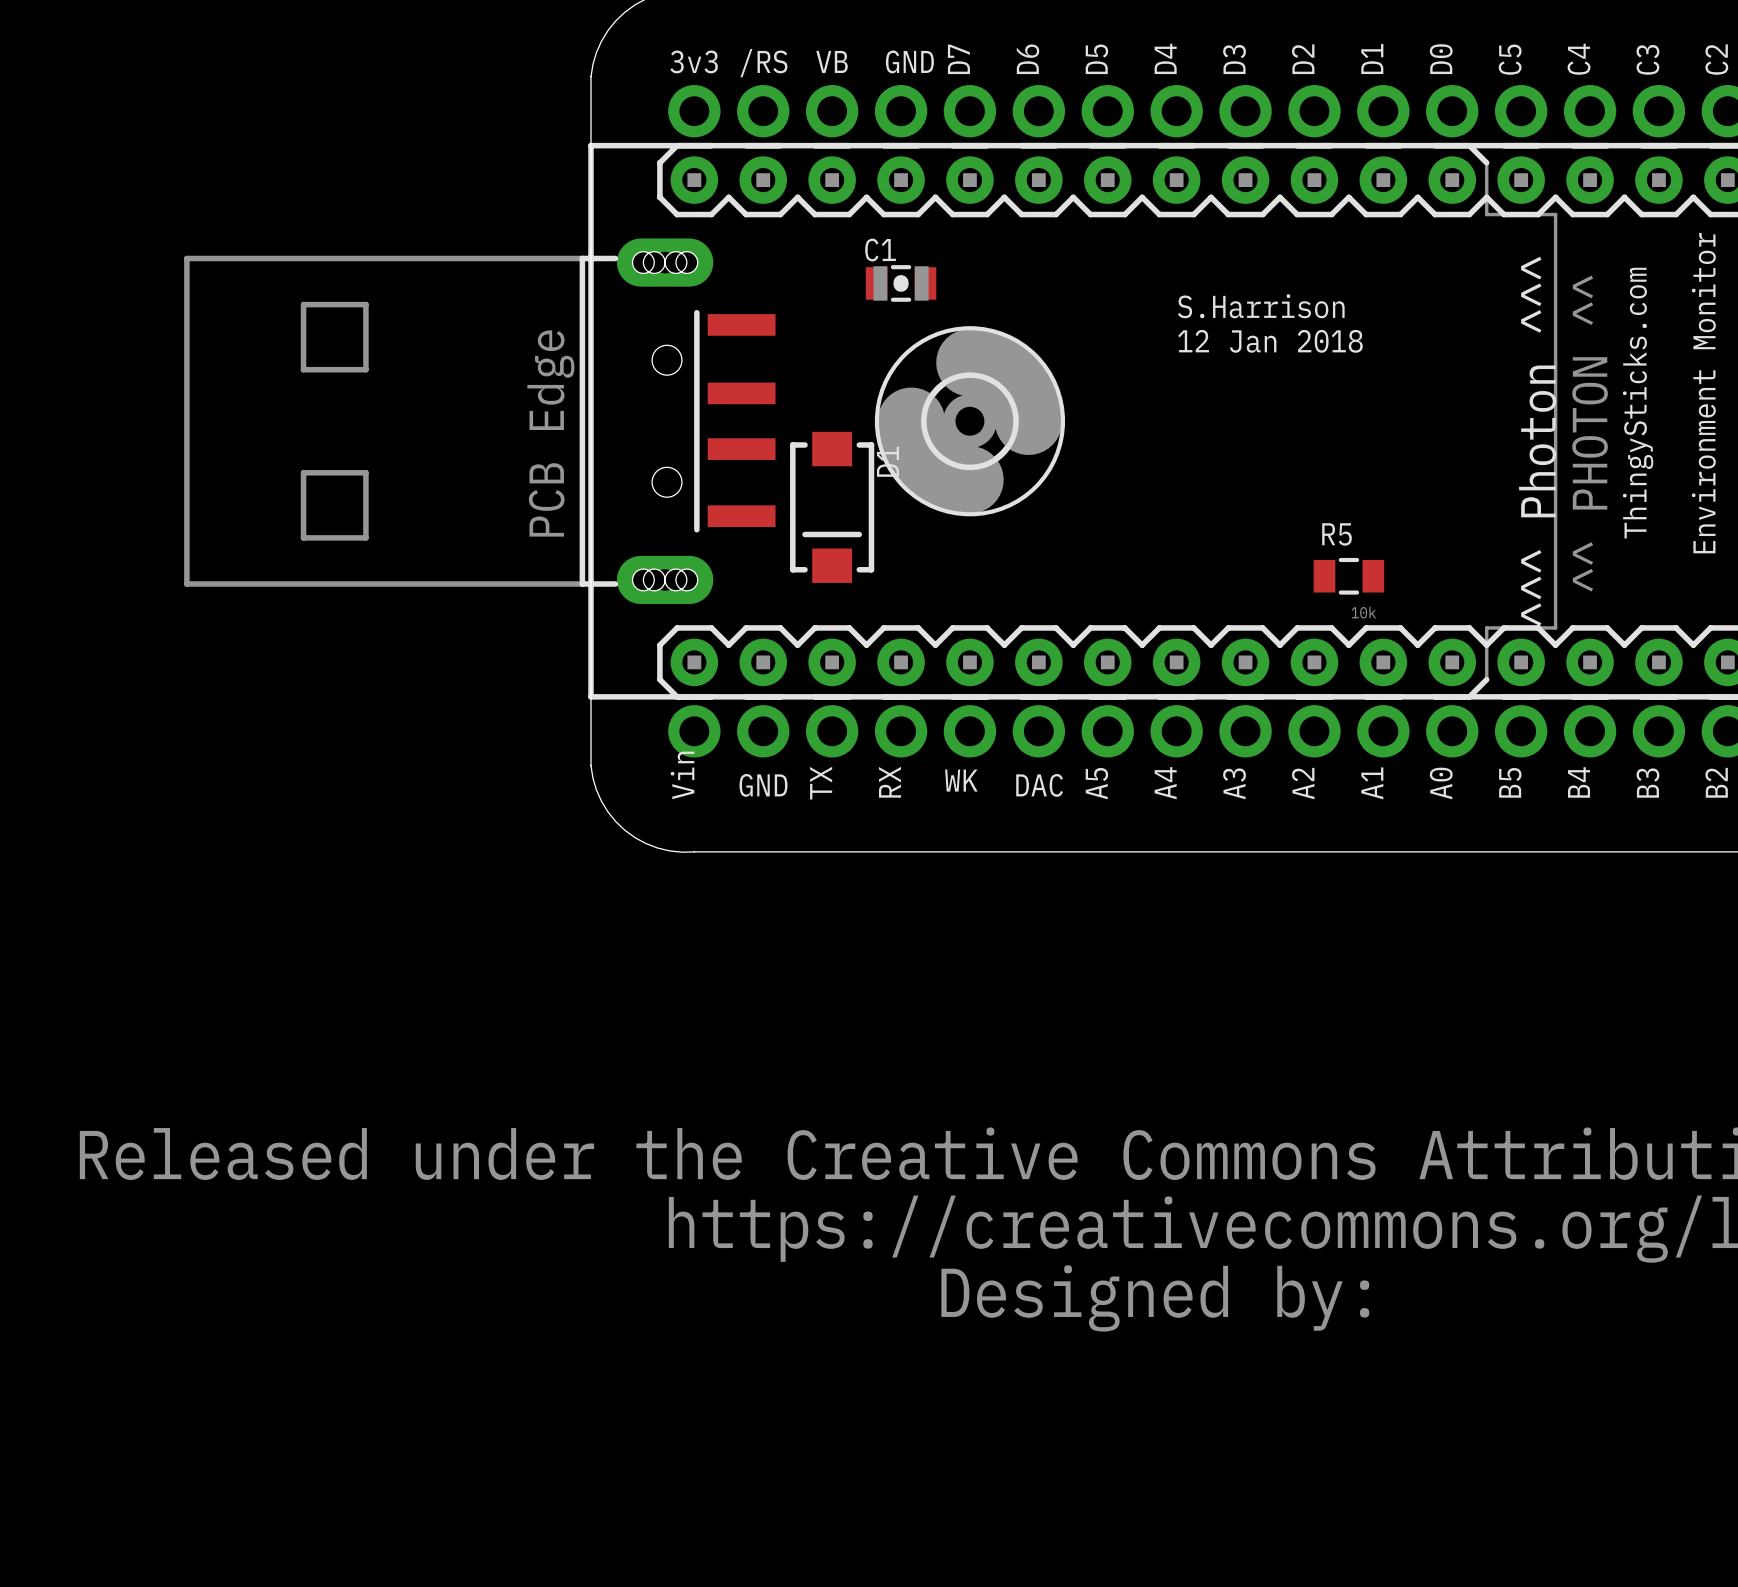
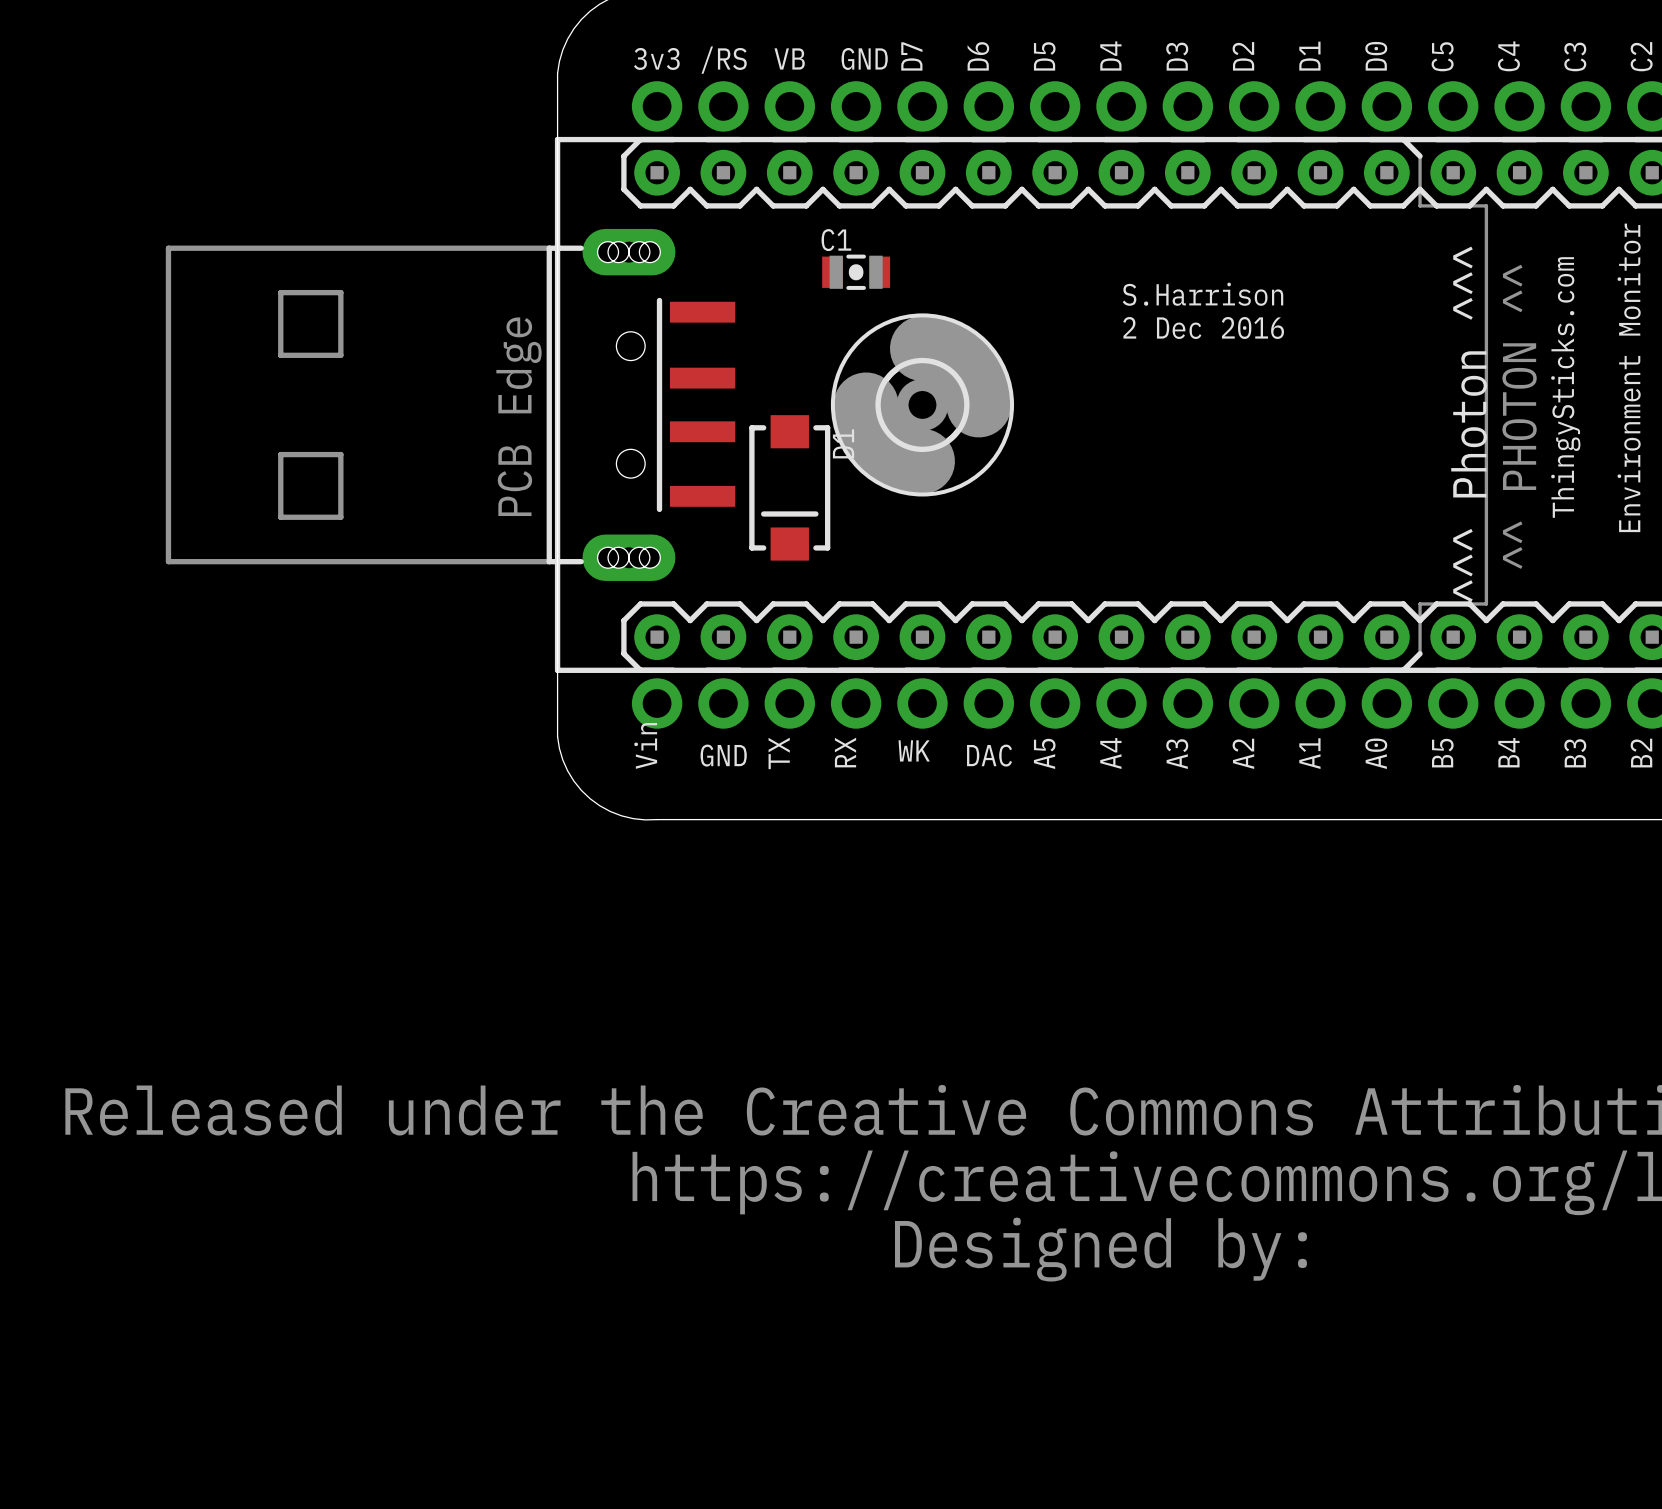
text: 12 Jan 2018 (1270, 341) -> 2 Dec 2016 (1203, 327)
R5: 10k (1348, 576) -> none

